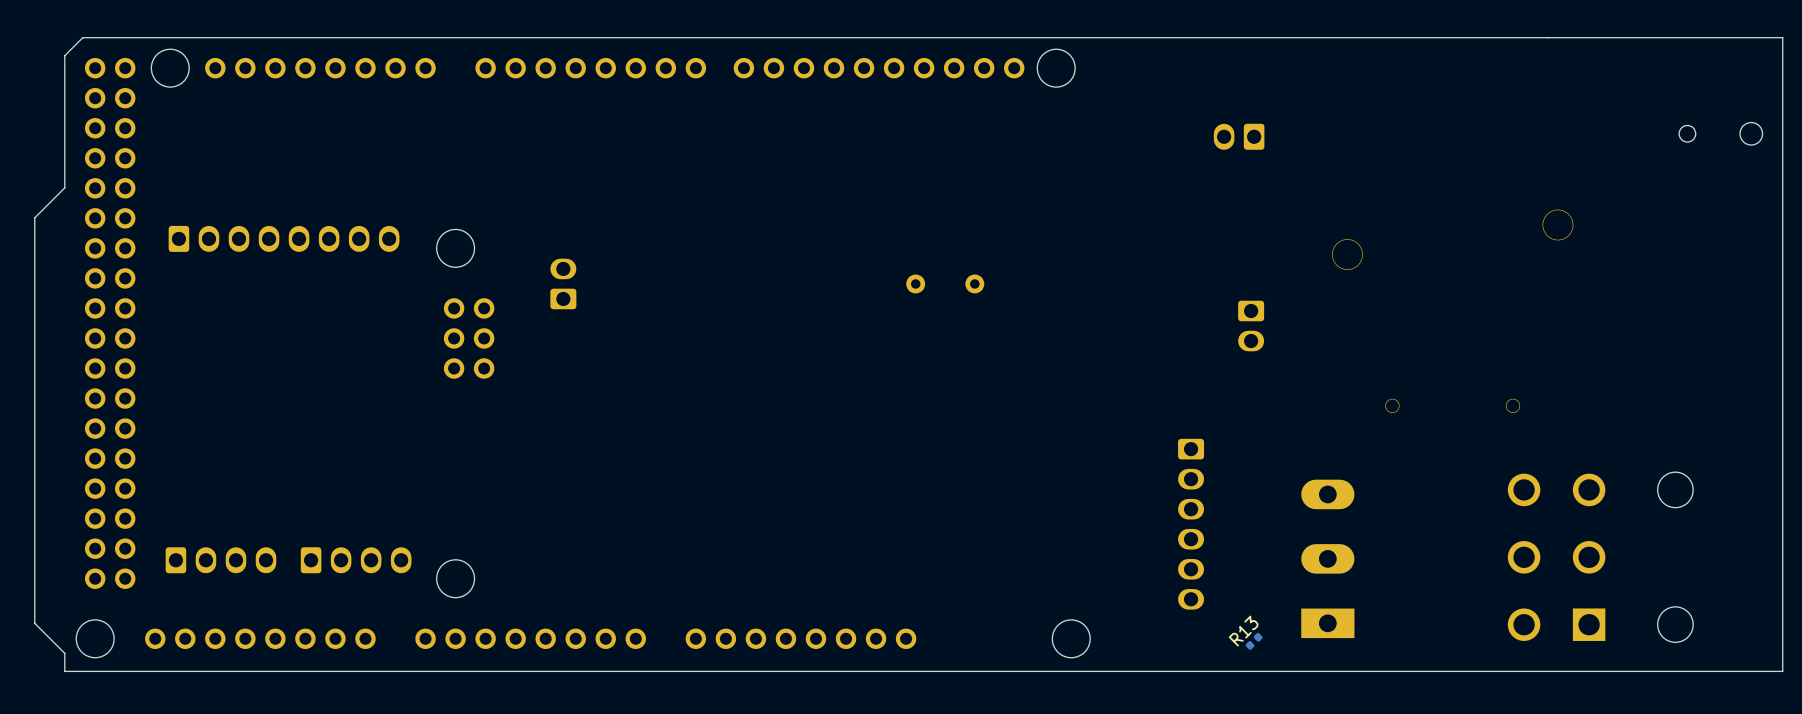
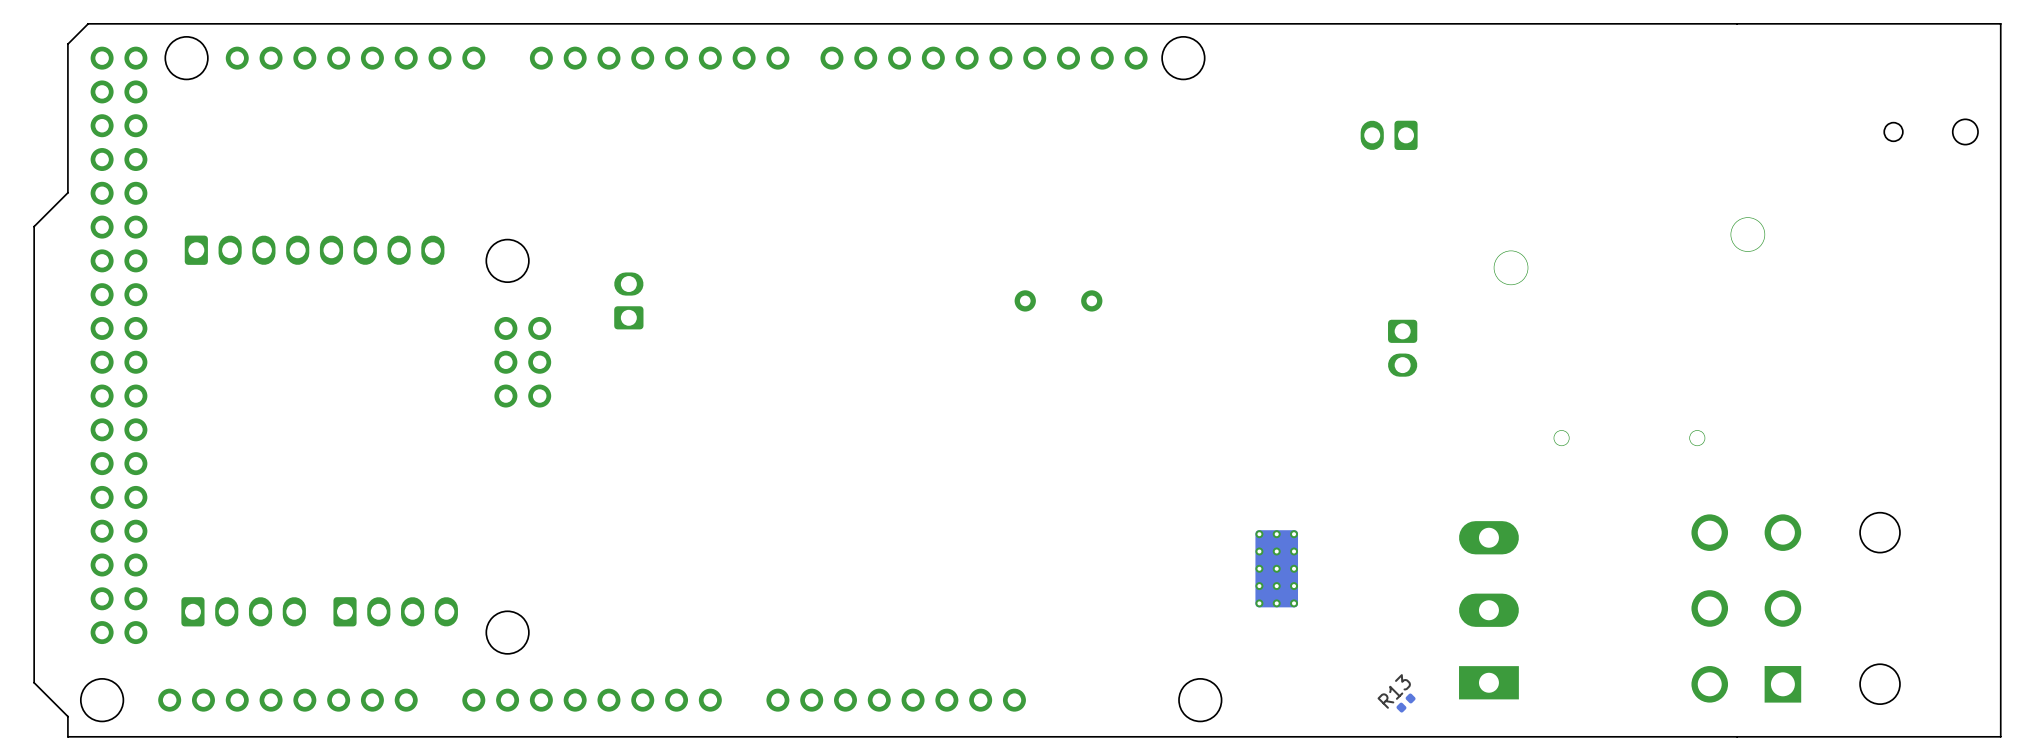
part: none -> (1276, 568)
part: (1191, 524) -> none

